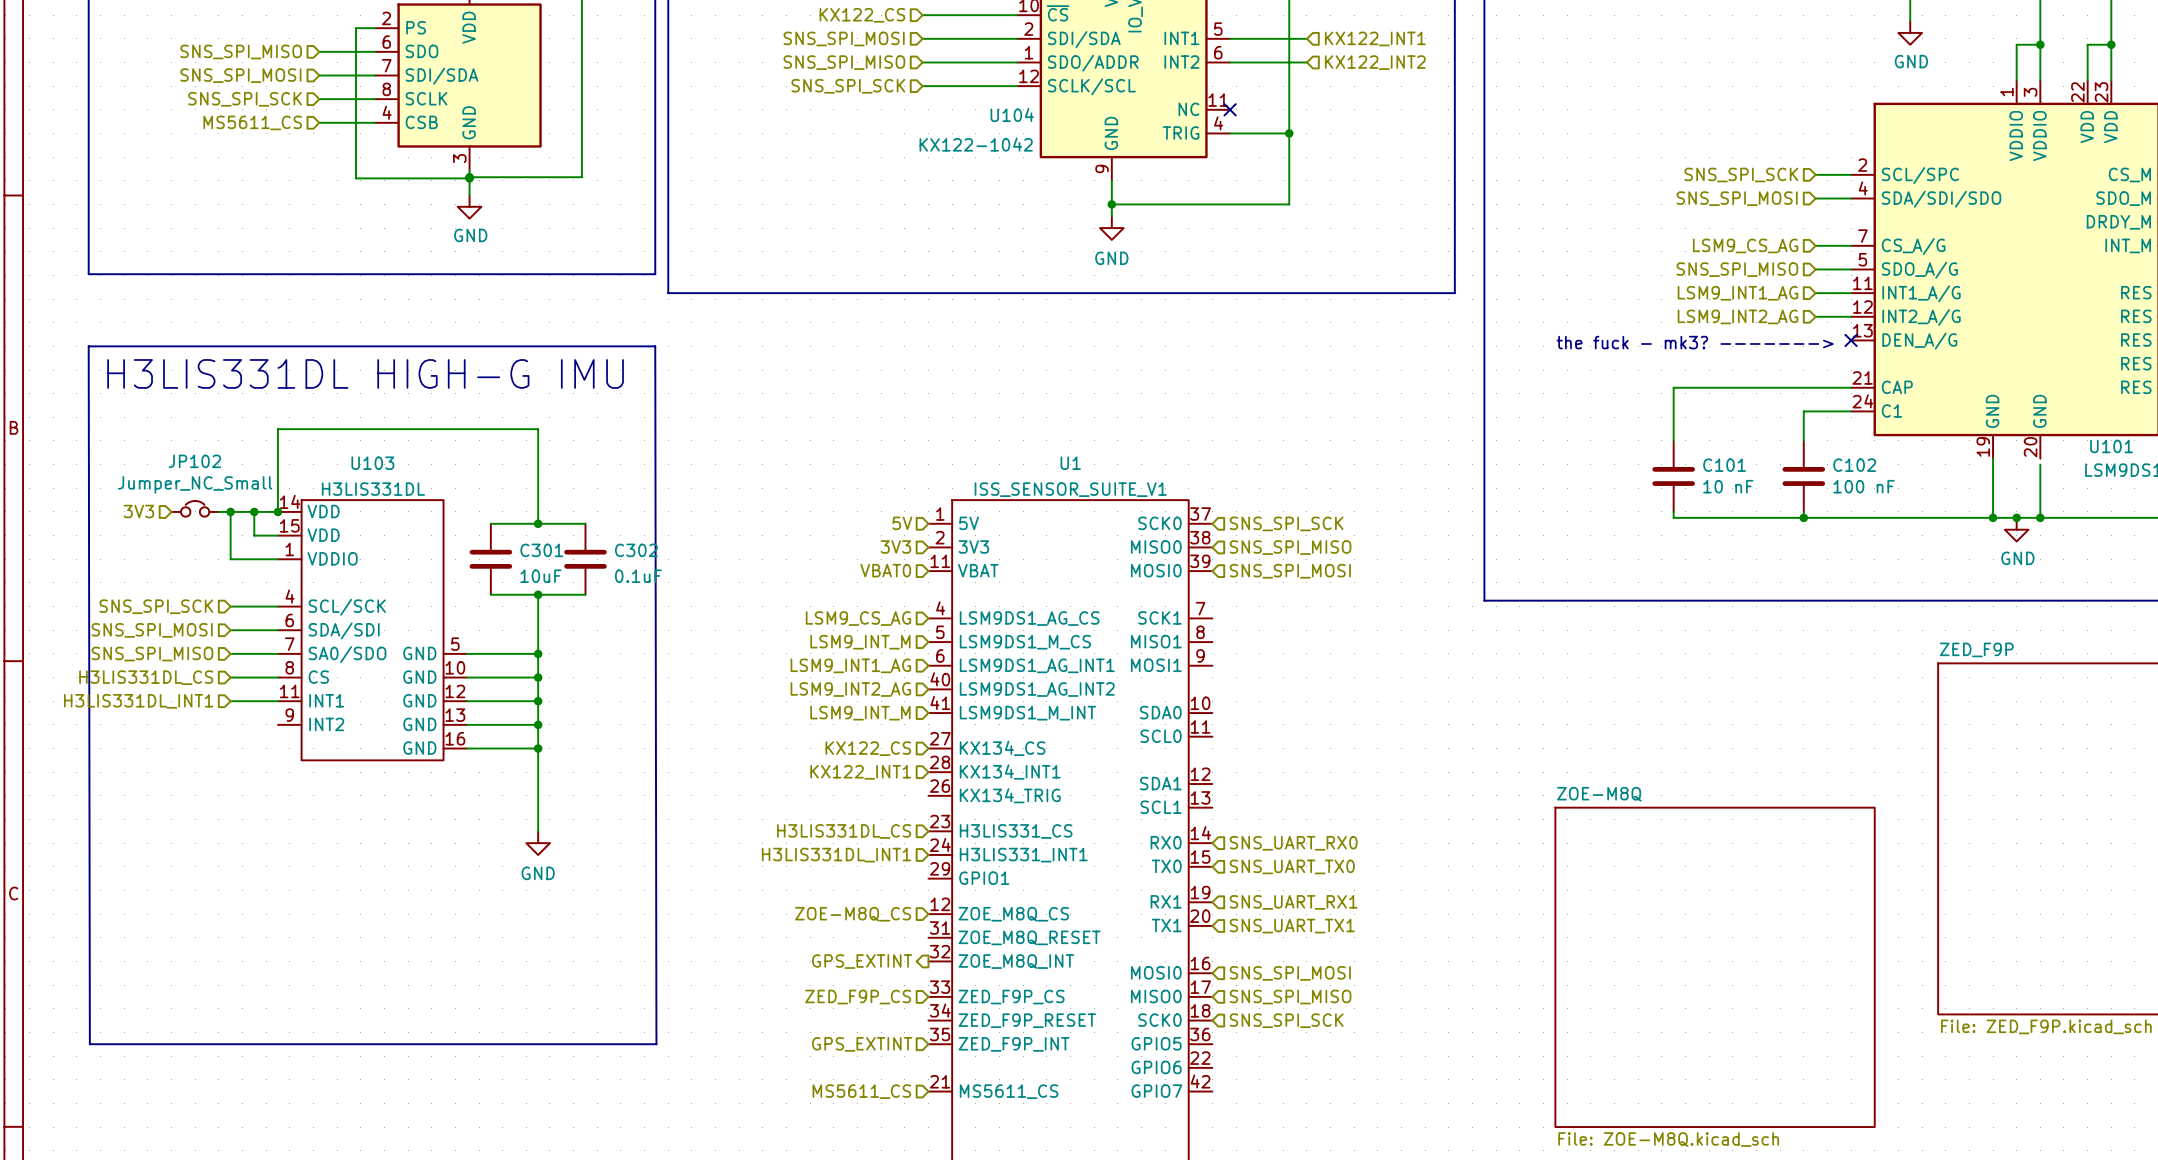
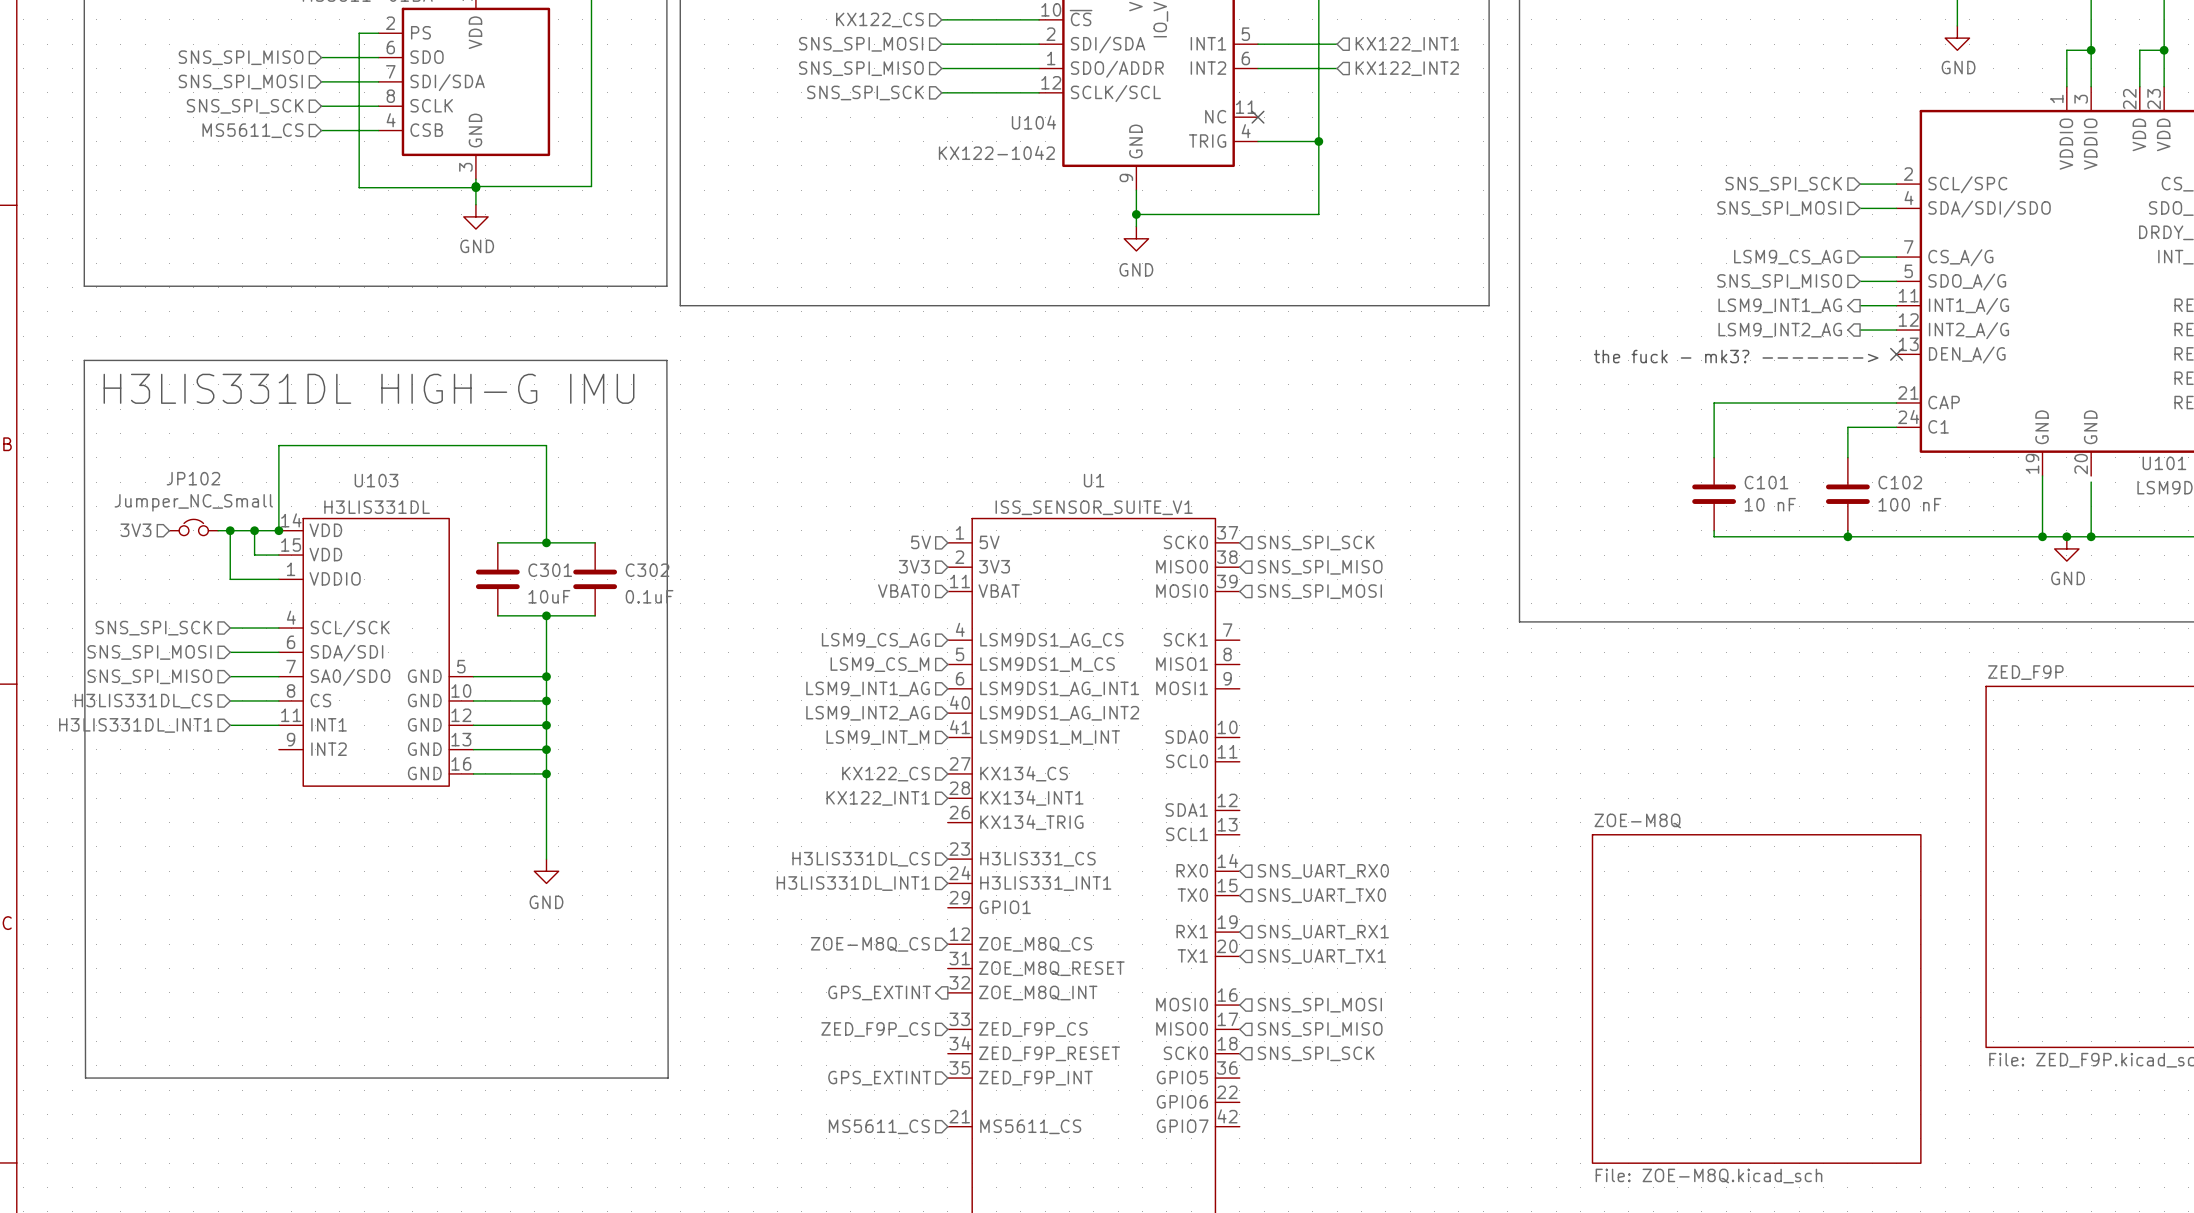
hierarchical label shape: input (1737, 293) -> output (1780, 305)
hierarchical label shape: input (1737, 316) -> output (1780, 330)
hierarchical label: LSM9_INT_M (860, 642) -> LSM9_CS_M (879, 664)

